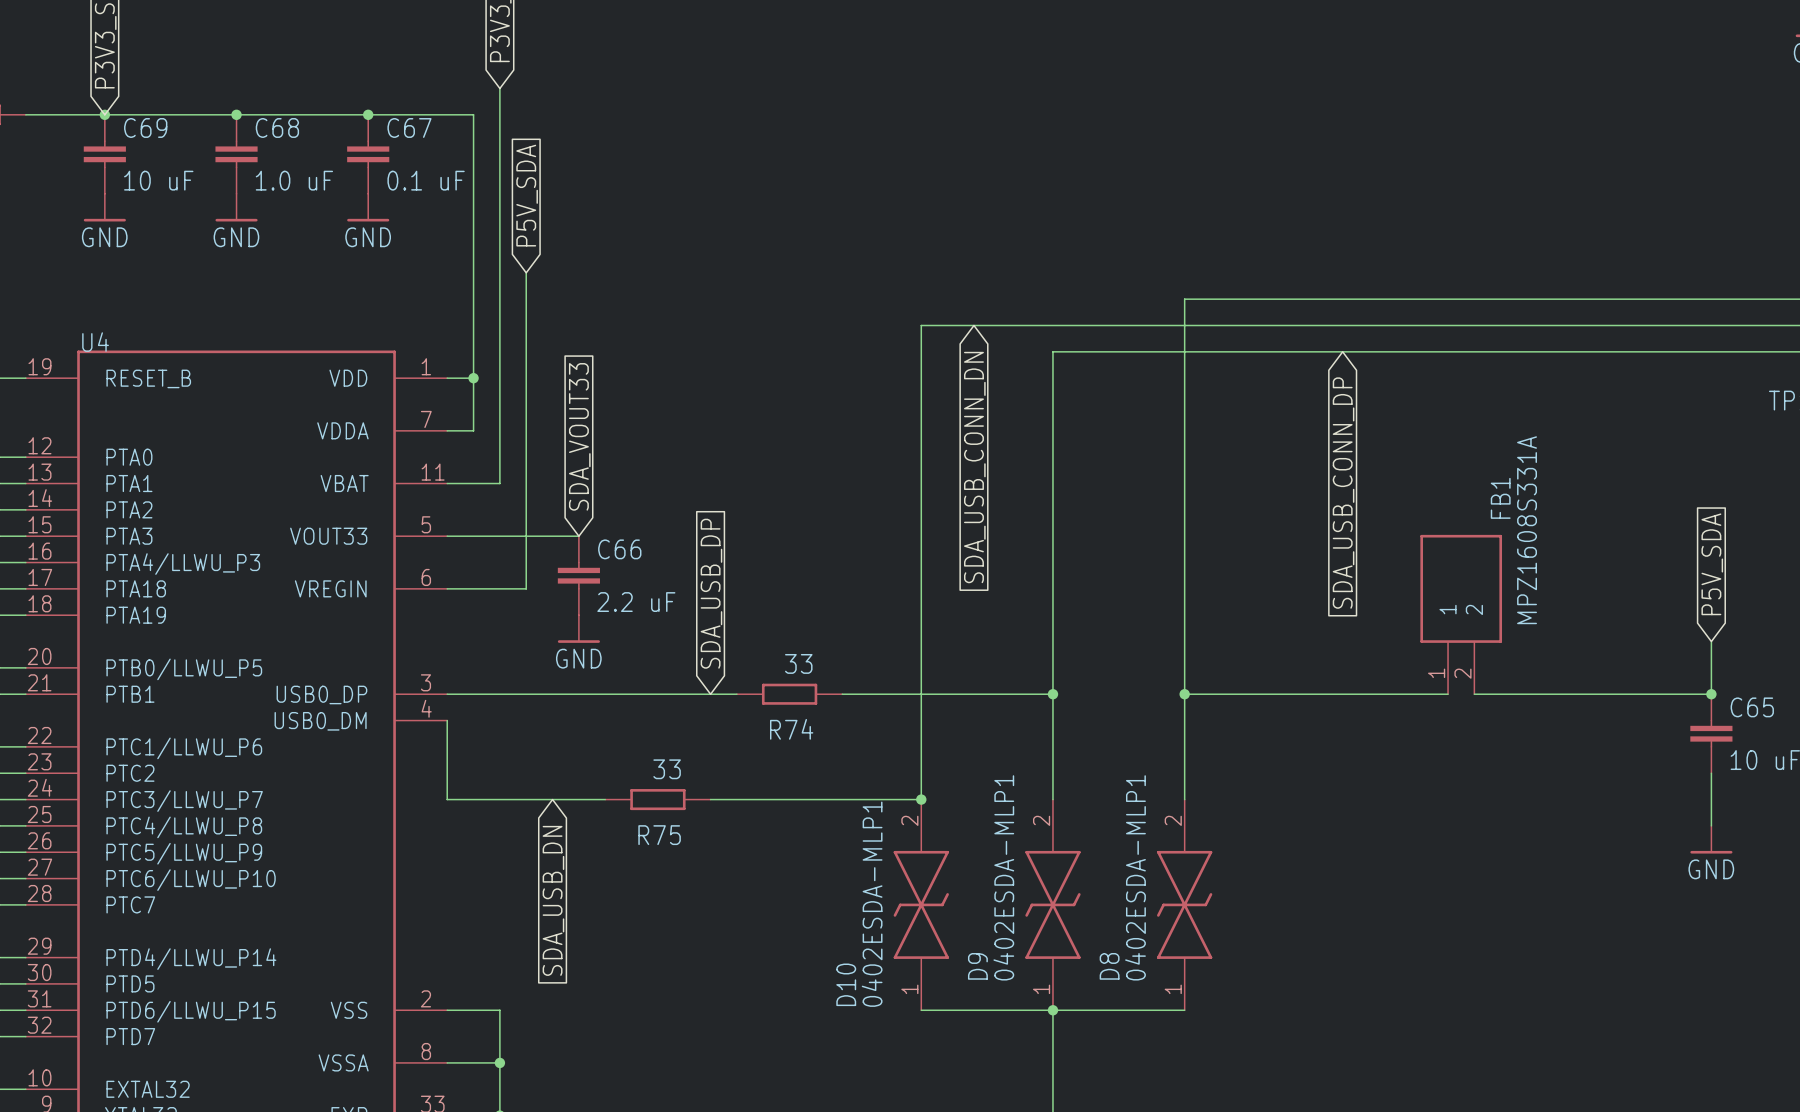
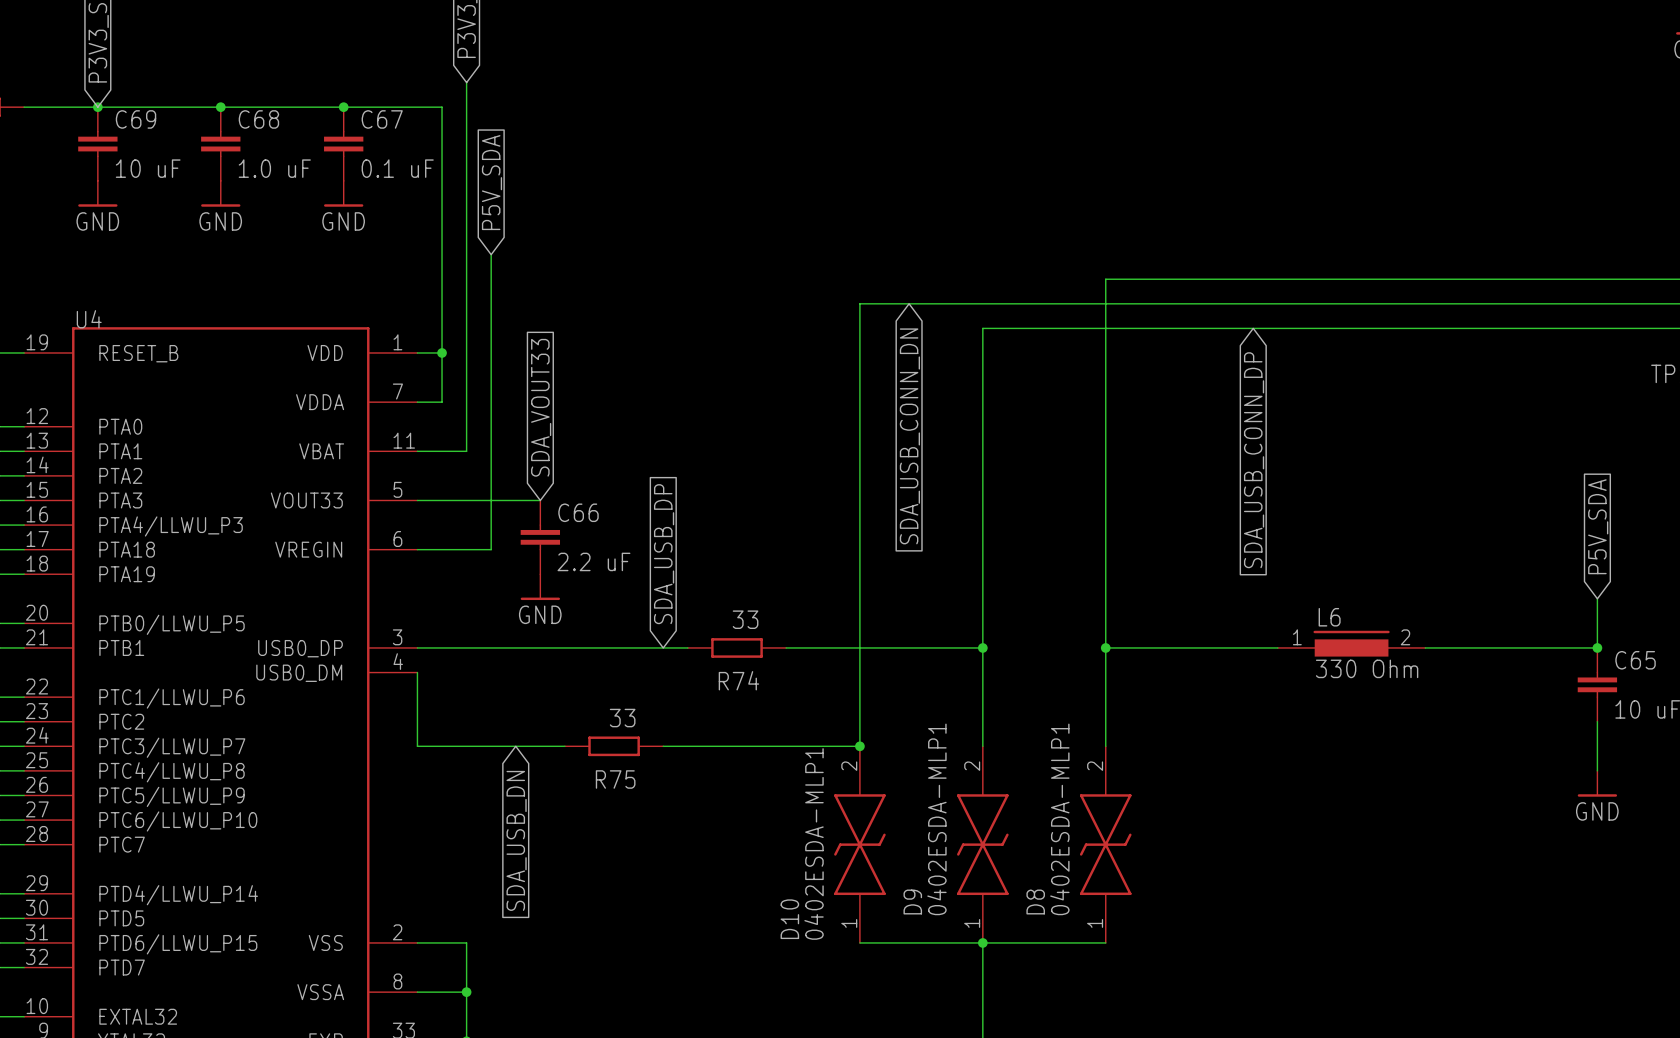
FB1: MPZ1608S331A (1461, 614) -> none
L6: none -> 330 Ohm (1351, 643)

